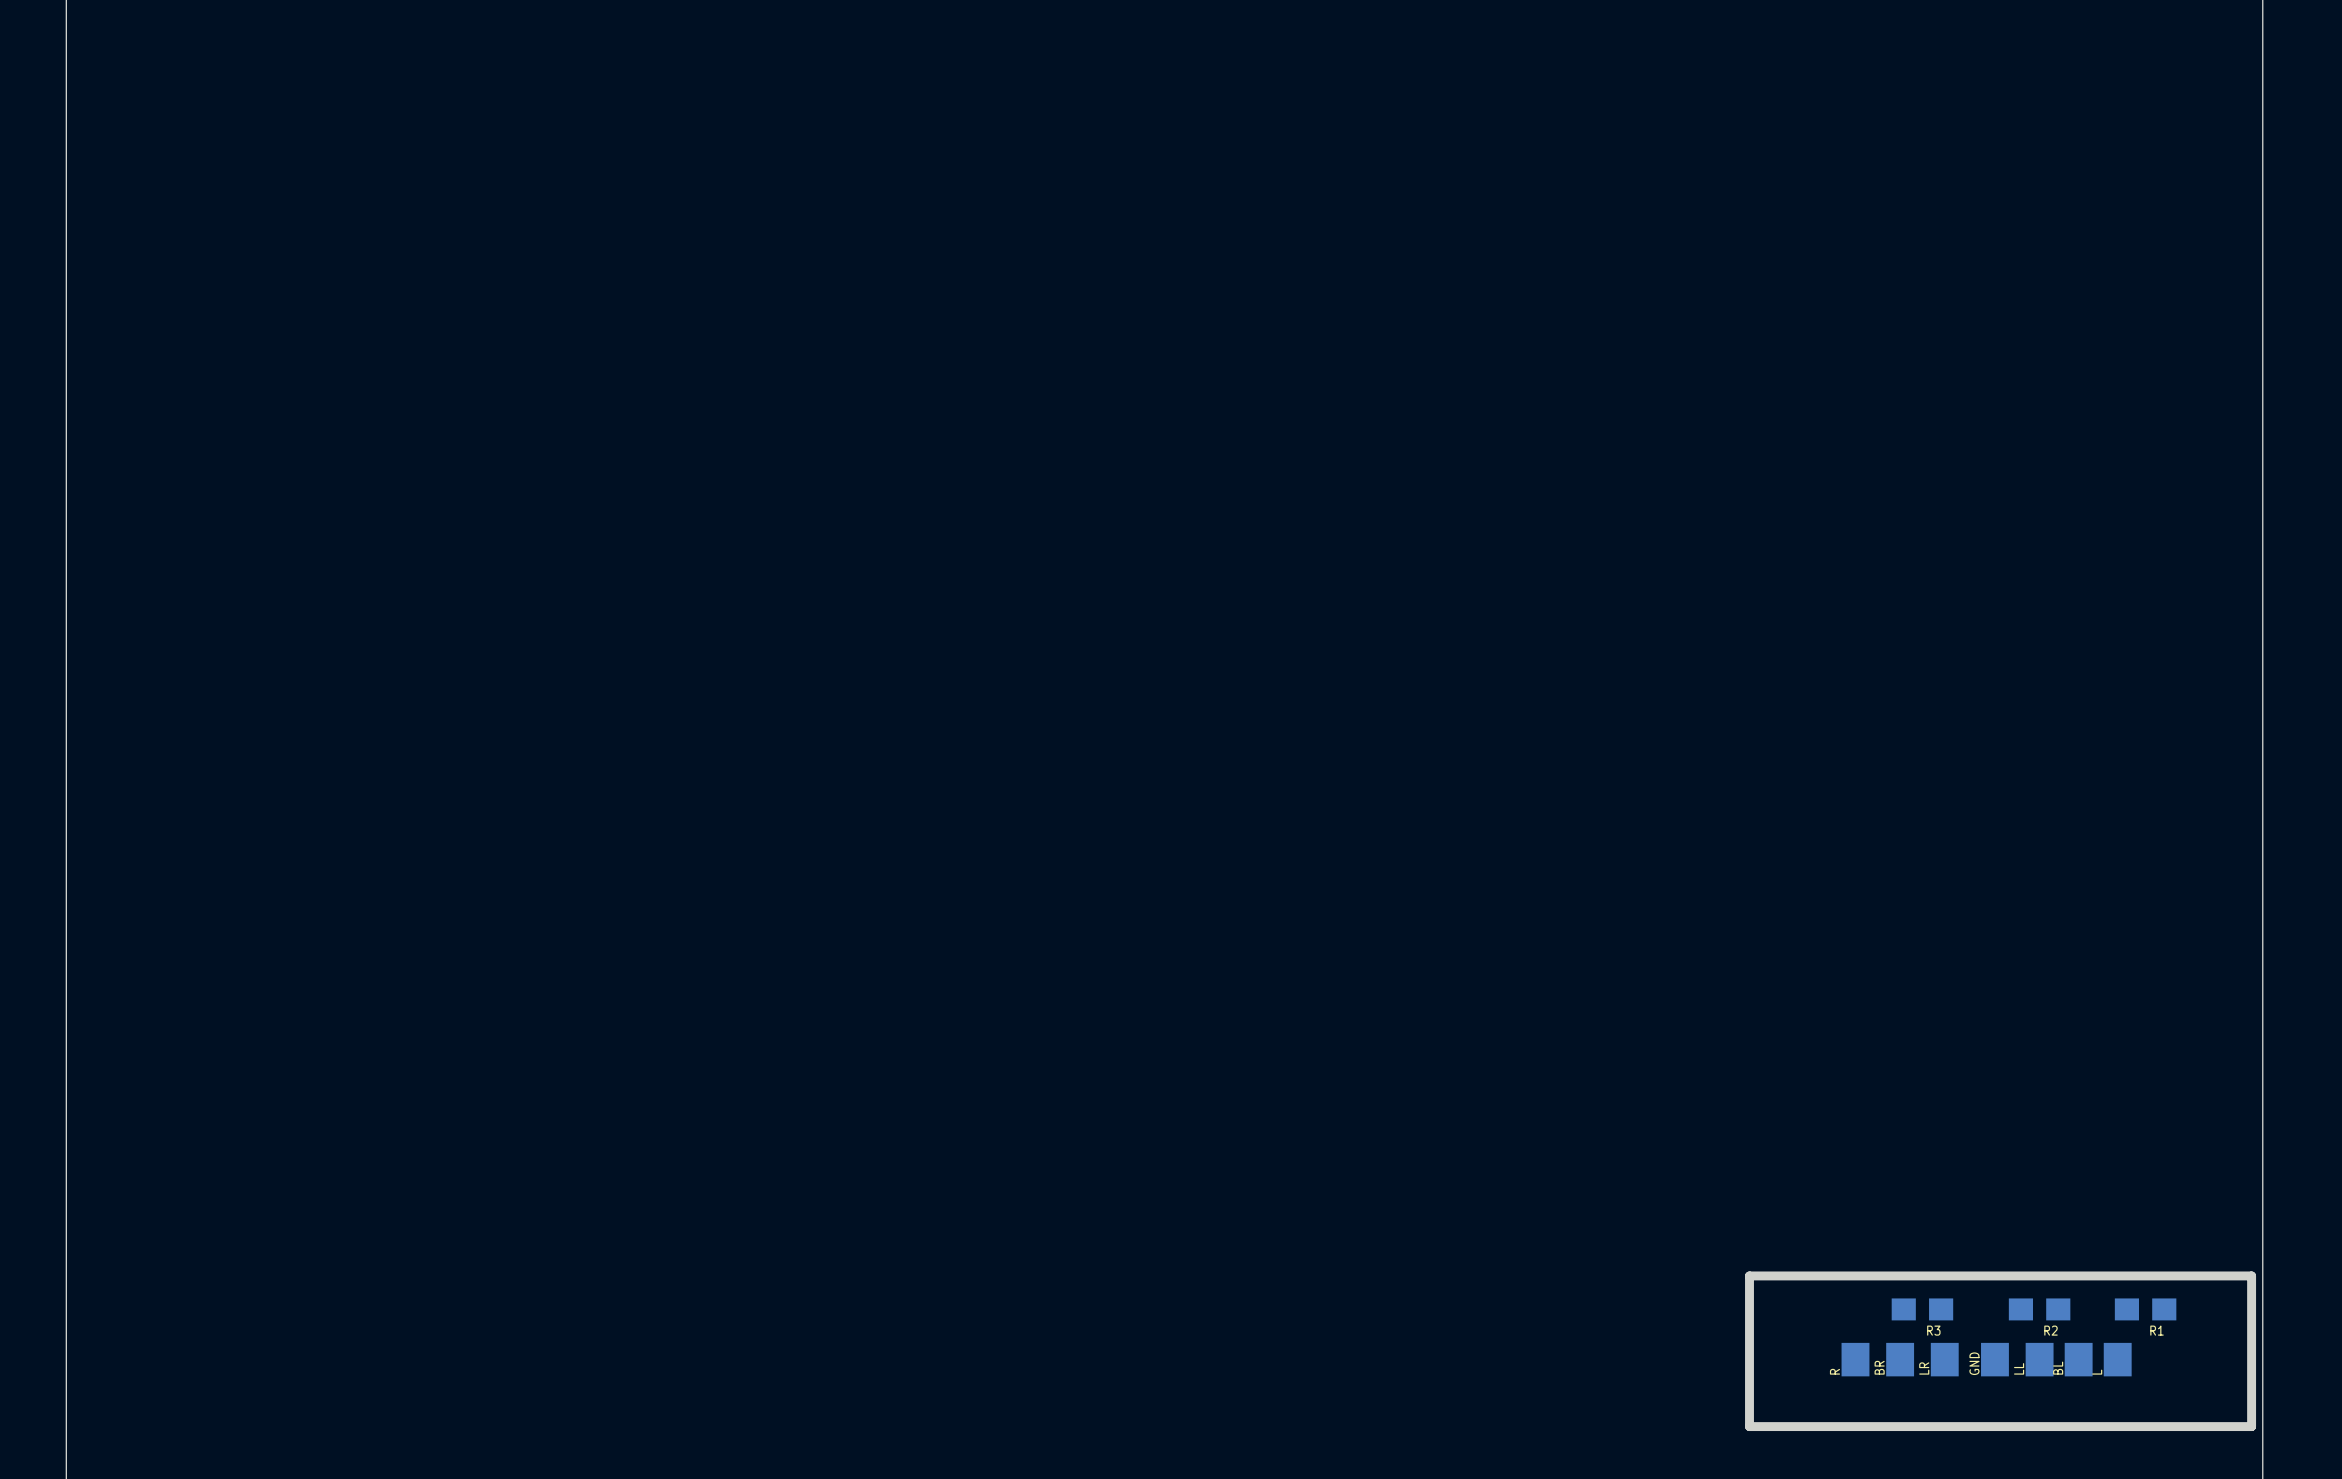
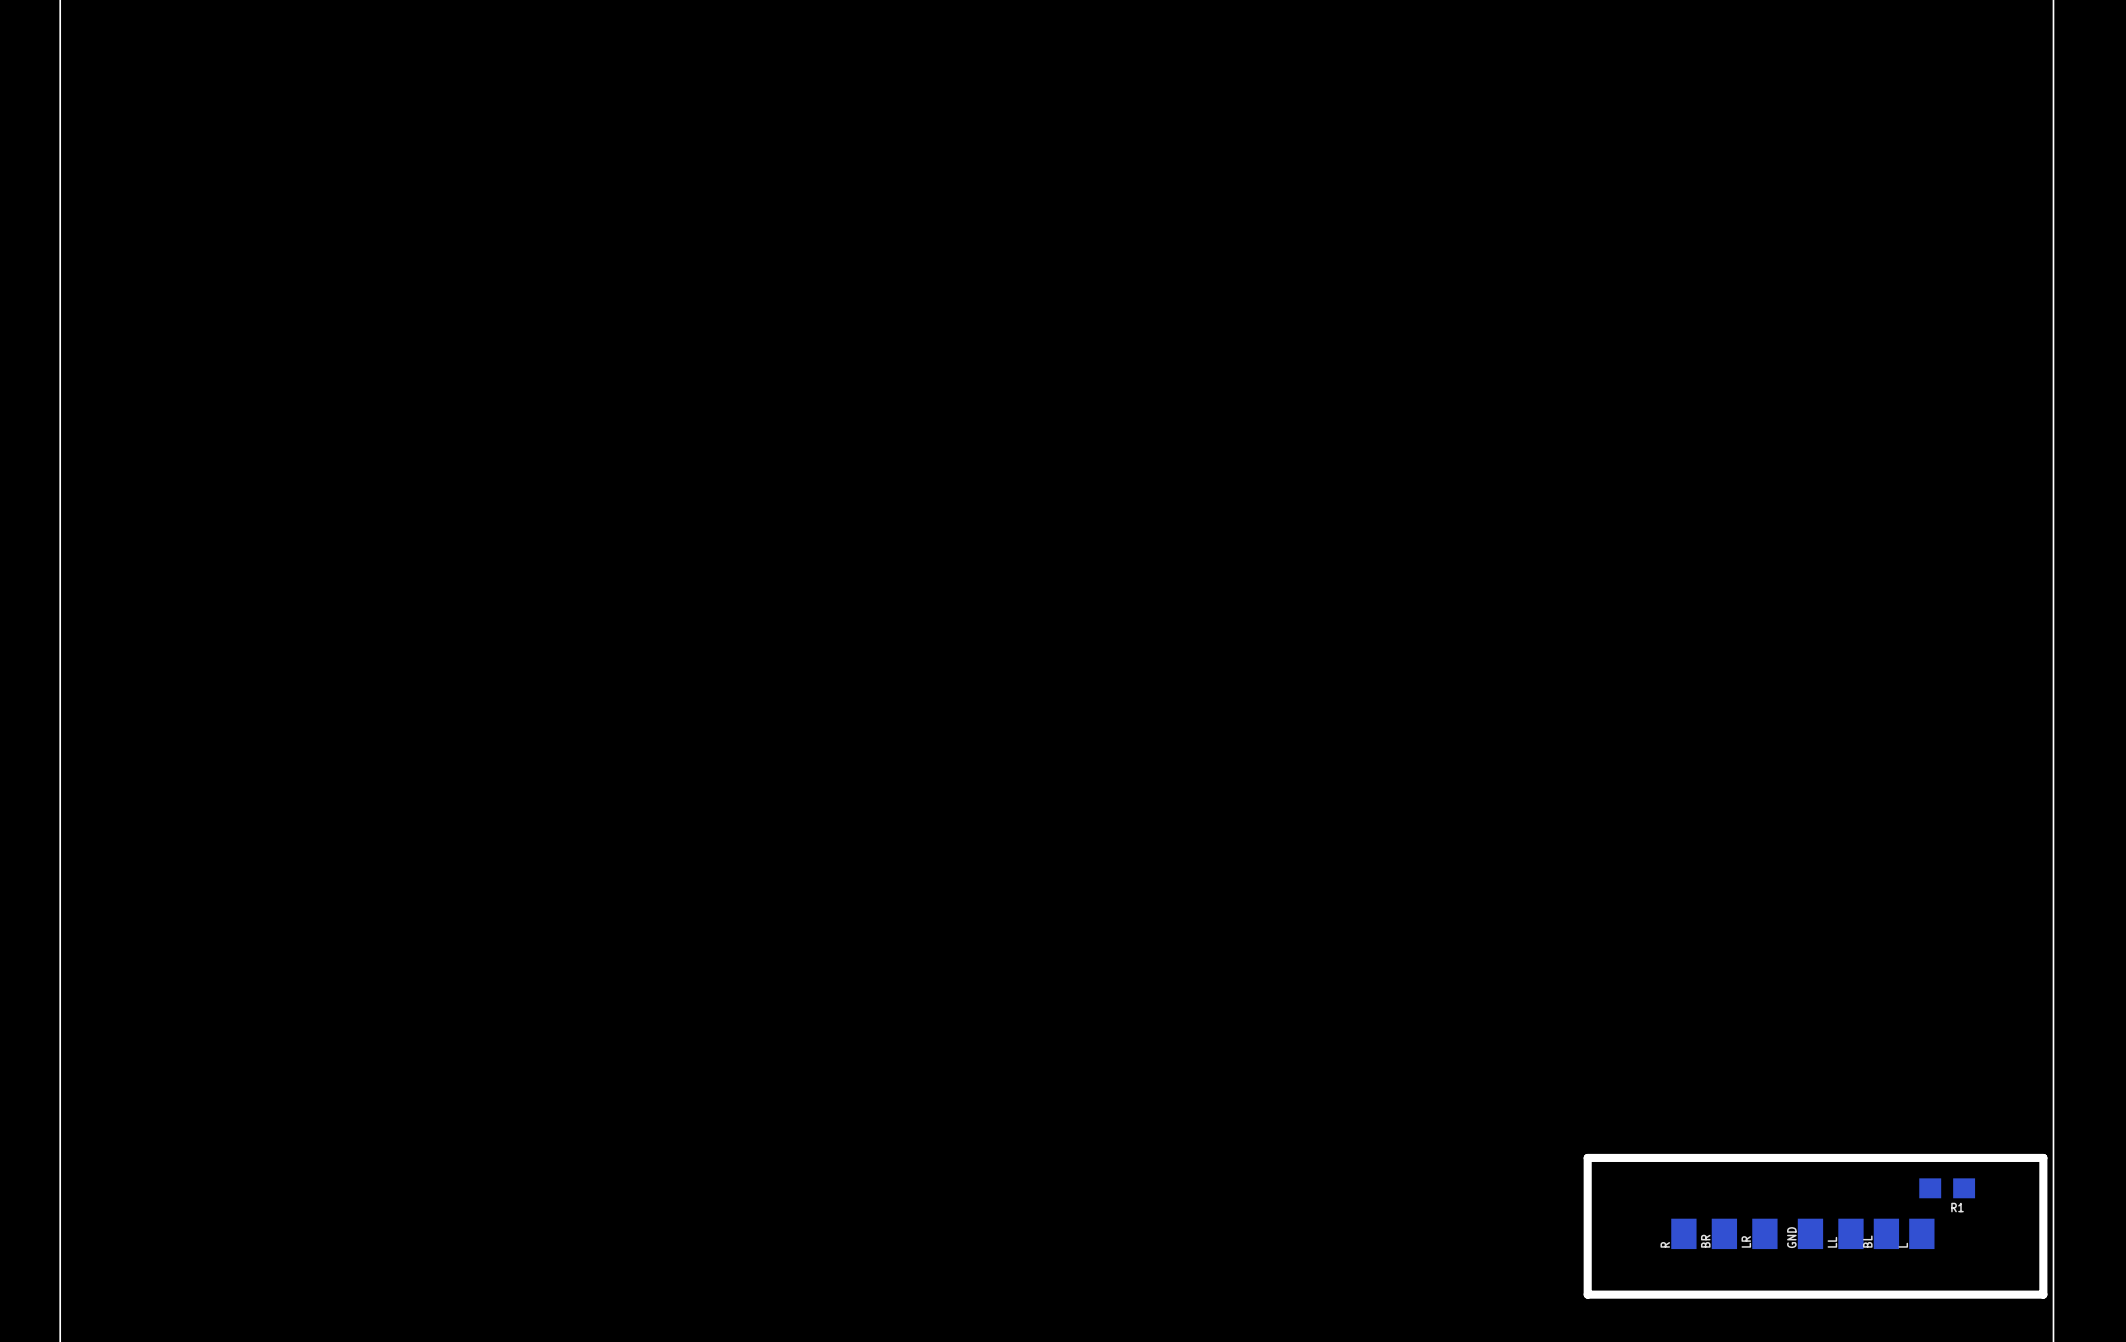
R3: (1922, 1309) -> none
R2: (2039, 1309) -> none

